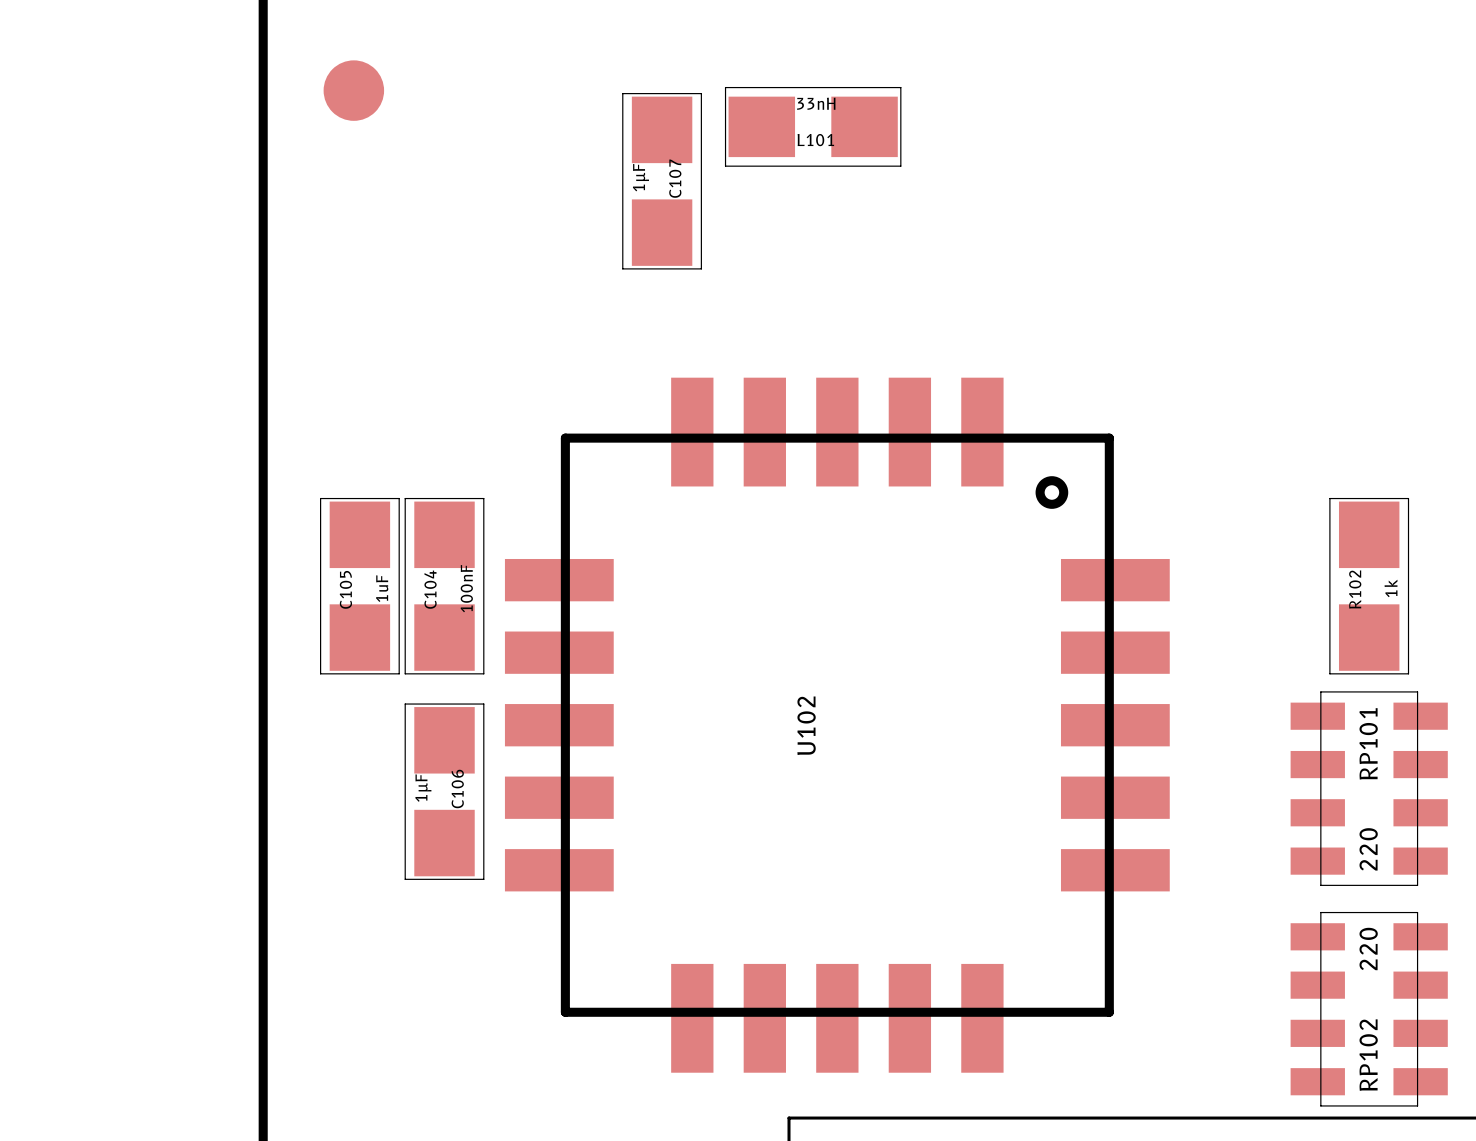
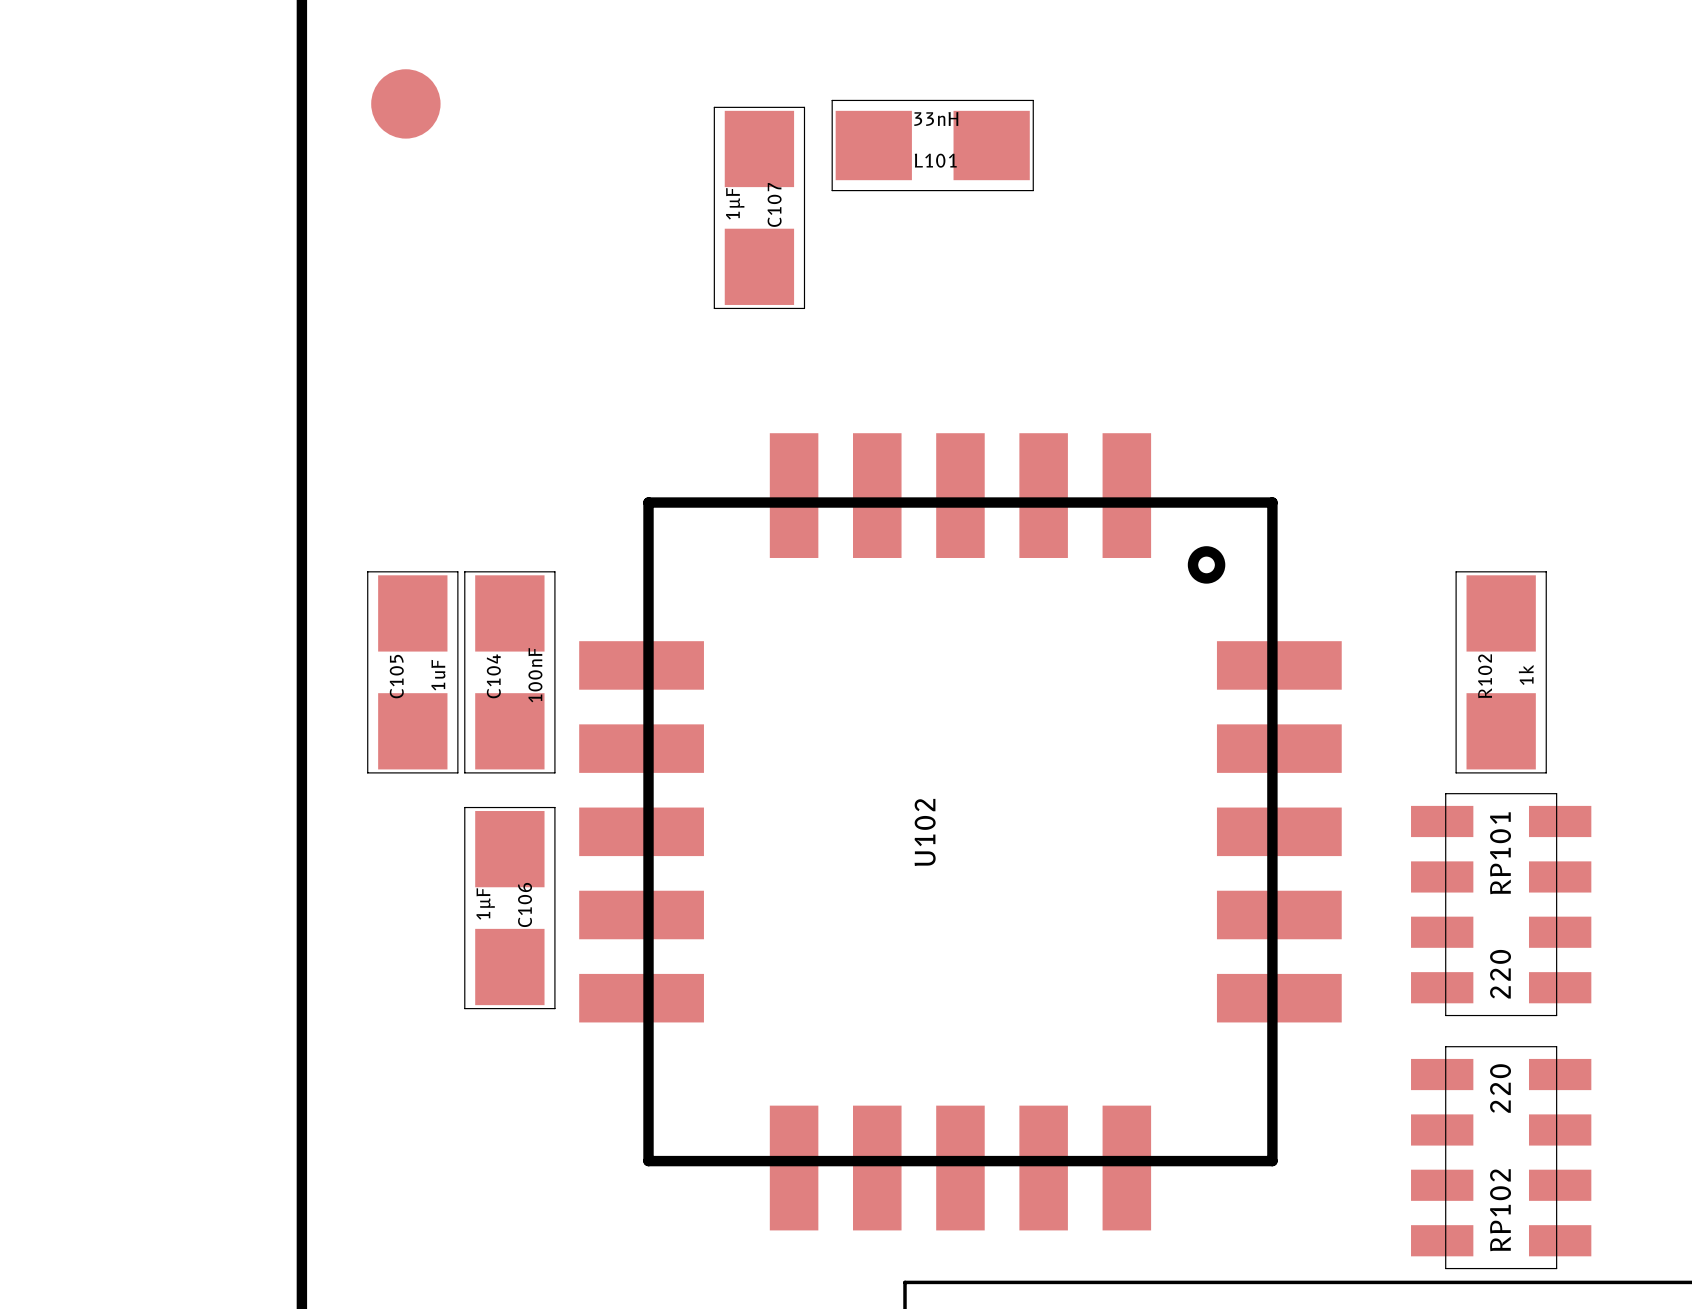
R102 position: (1369, 586) -> (1501, 672)
RP101 position: (1369, 788) -> (1501, 904)
RP102 position: (1369, 1009) -> (1501, 1157)

